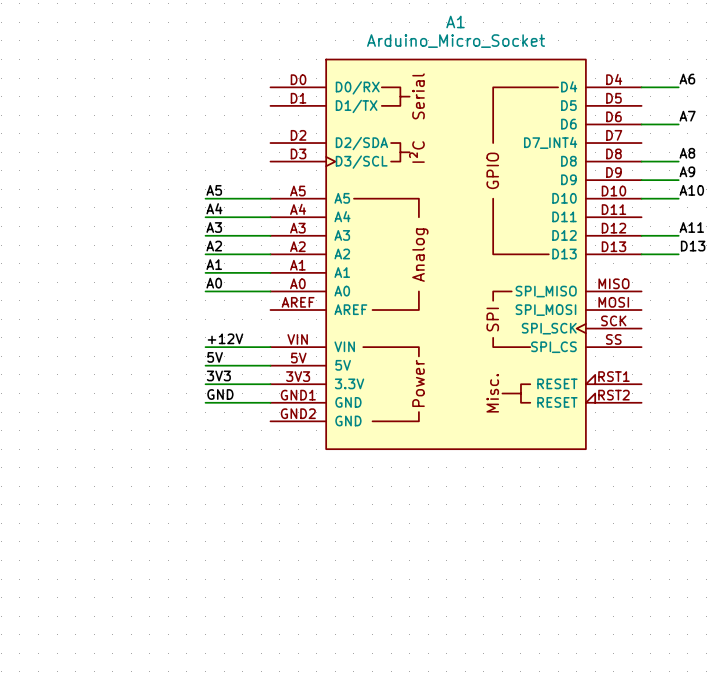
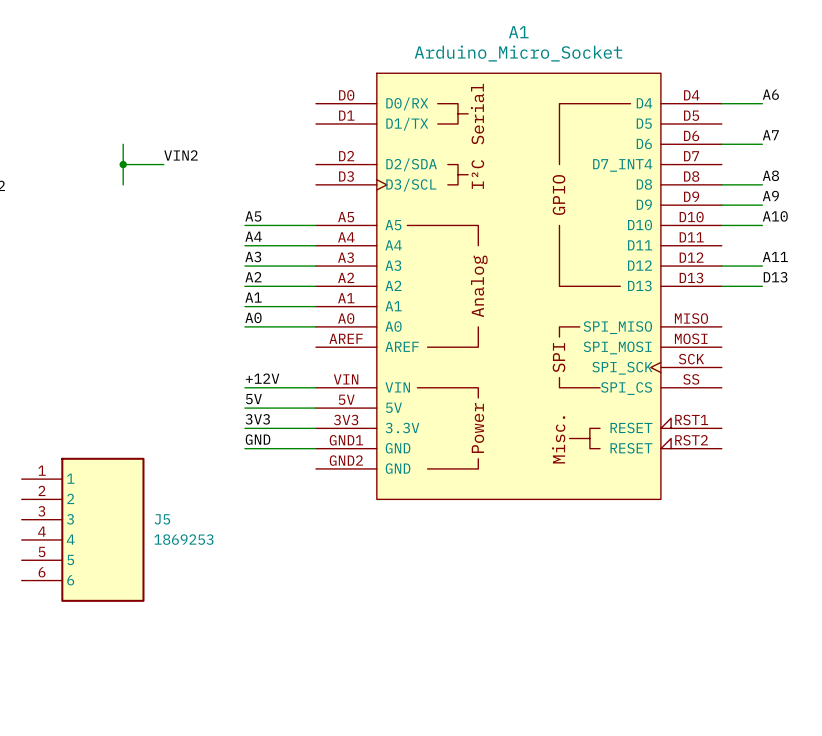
wire: none -> (123, 144) (123, 184)
label: none -> VIN2 (181, 155)
wire: none -> (123, 164) (163, 164)
junction: none -> (123, 164)
J5: none -> 1869253 (83, 529)

